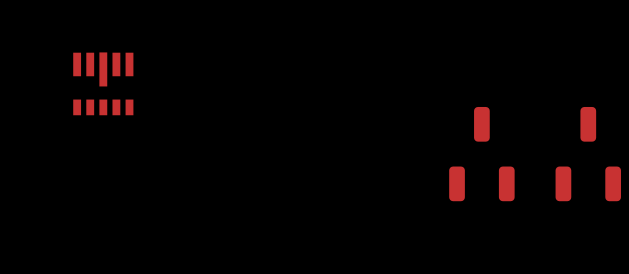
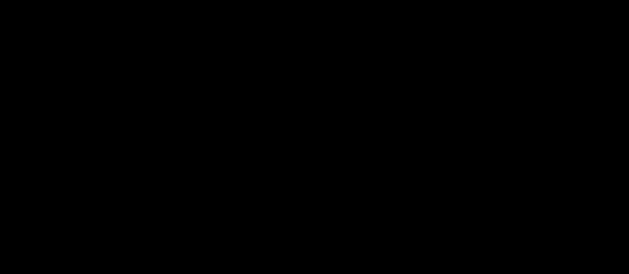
part: (103, 83) -> none
part: (481, 154) -> none
part: (588, 154) -> none

